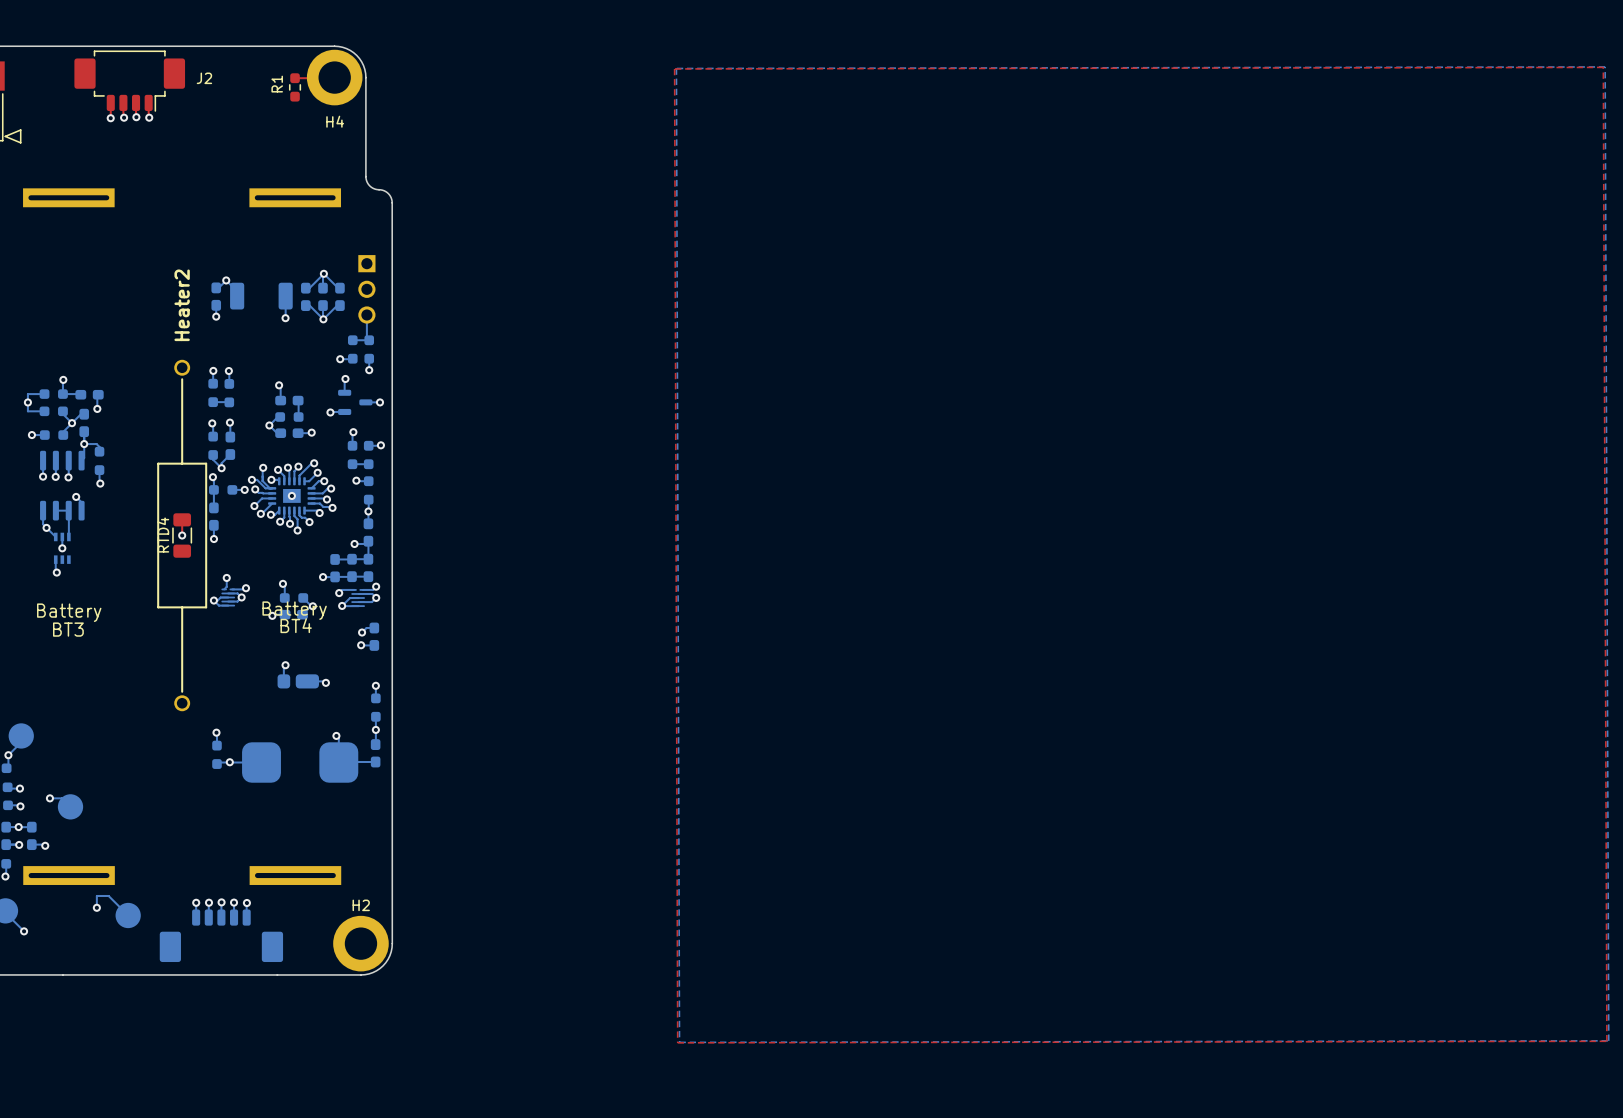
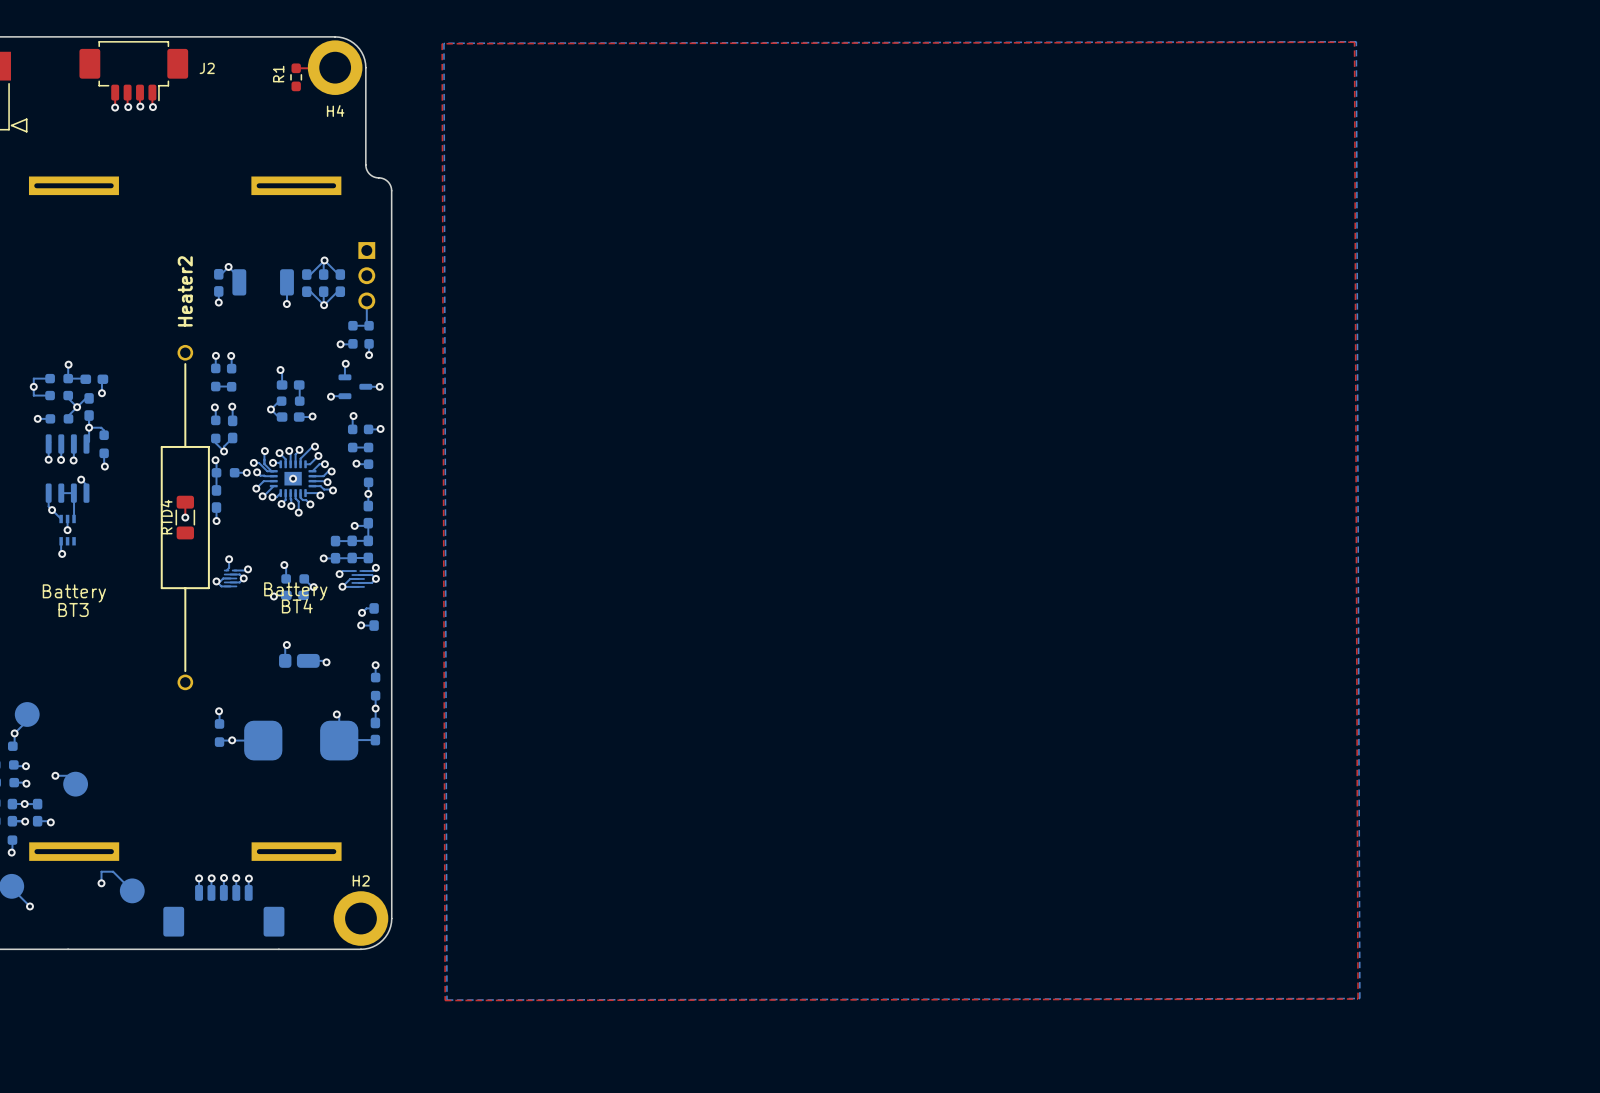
bottom zone outline: (1605, 66) (676, 68) (679, 1042) (1608, 1040) (1605, 66) -> (1356, 41) (443, 43) (446, 1000) (1359, 998) (1356, 41)
top zone outline: (1603, 67) (674, 68) (677, 1042) (1606, 1041) (1603, 67) -> (1354, 42) (442, 43) (445, 1000) (1358, 999) (1354, 42)

